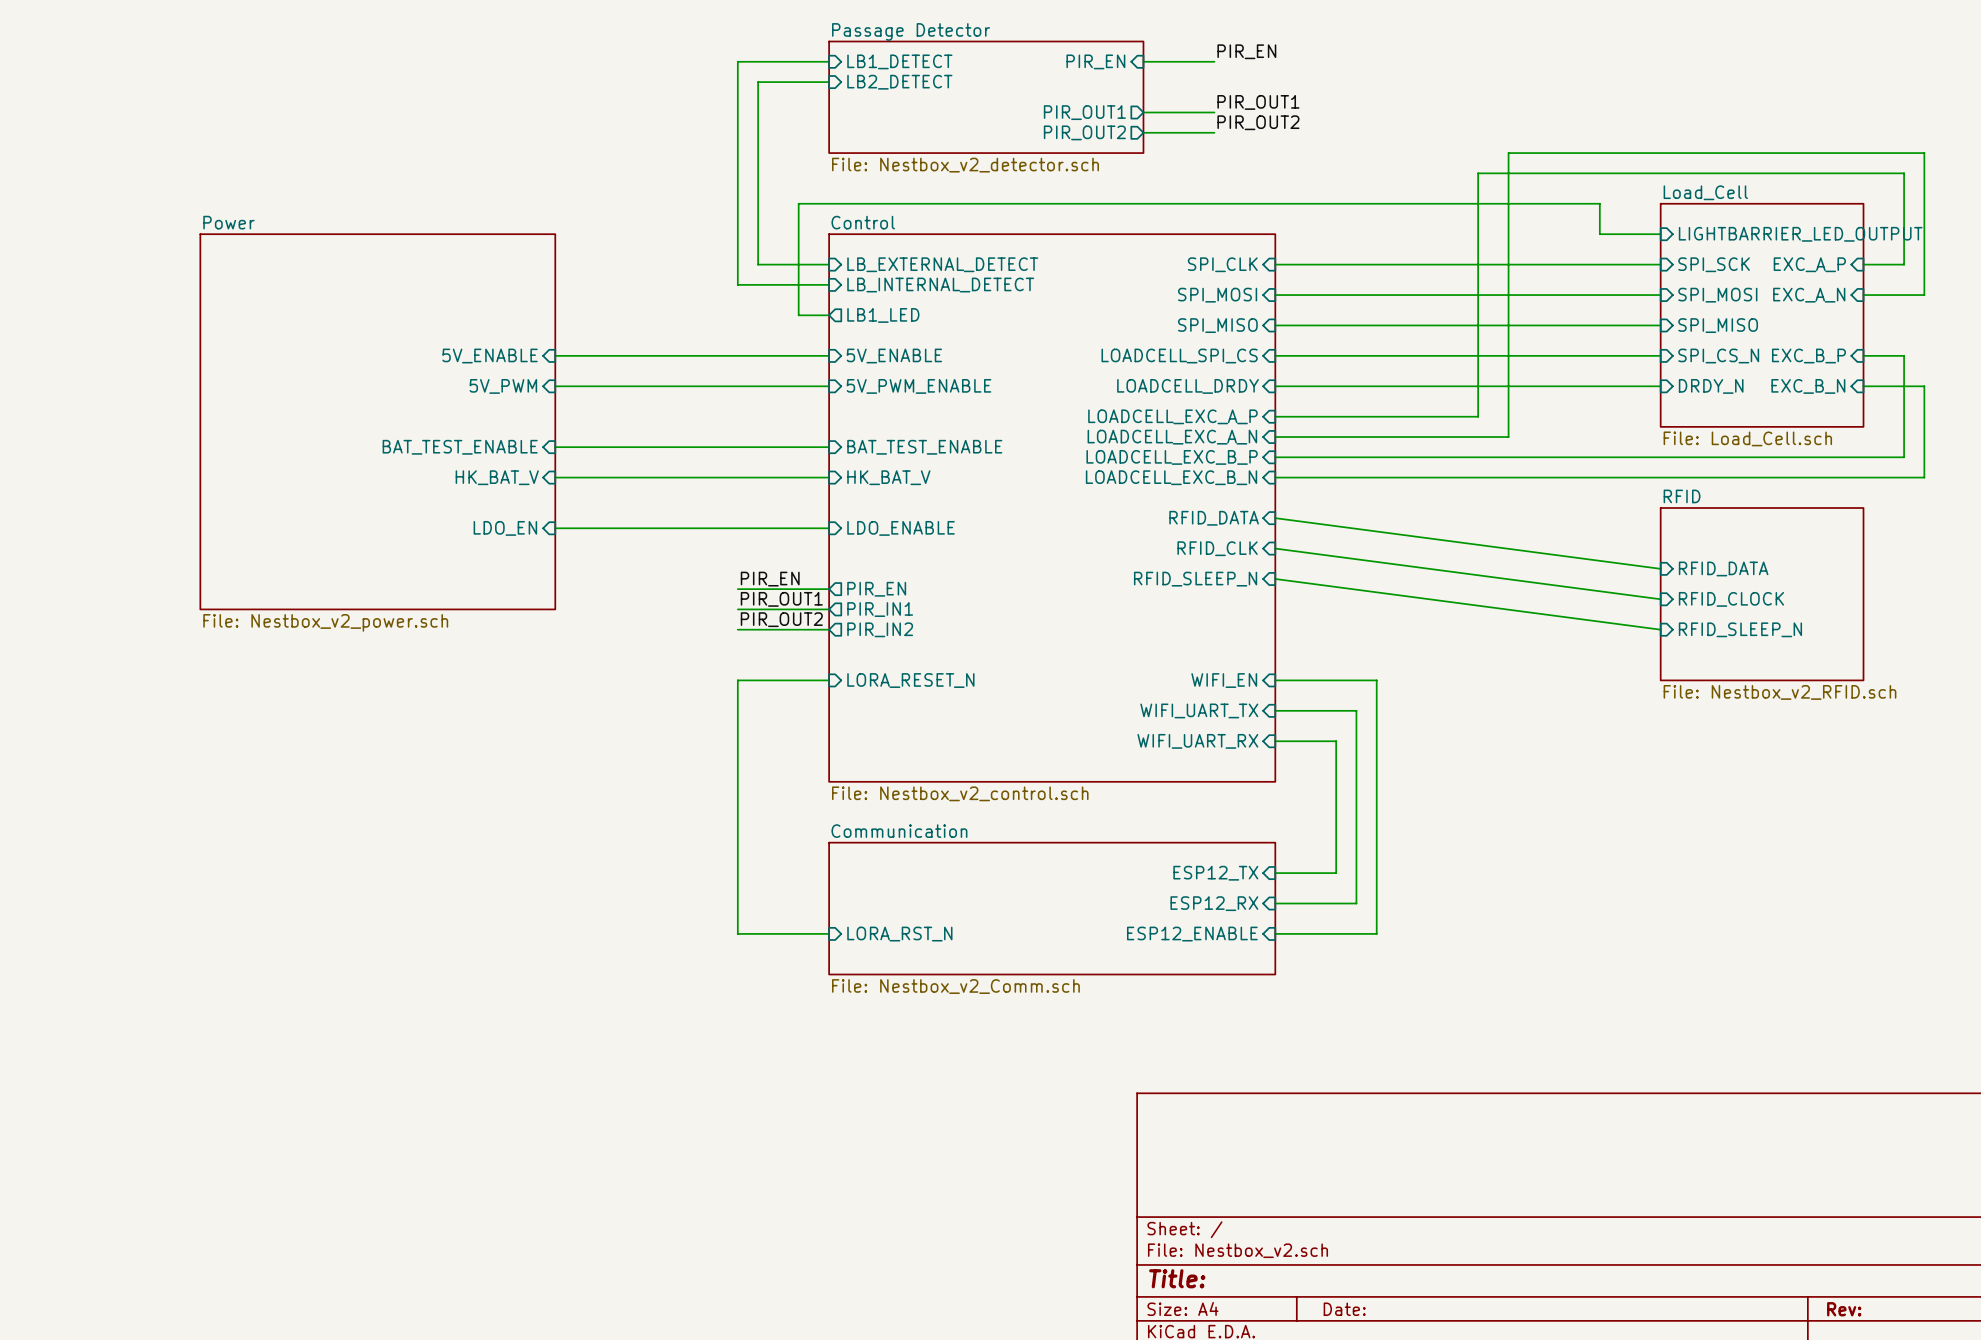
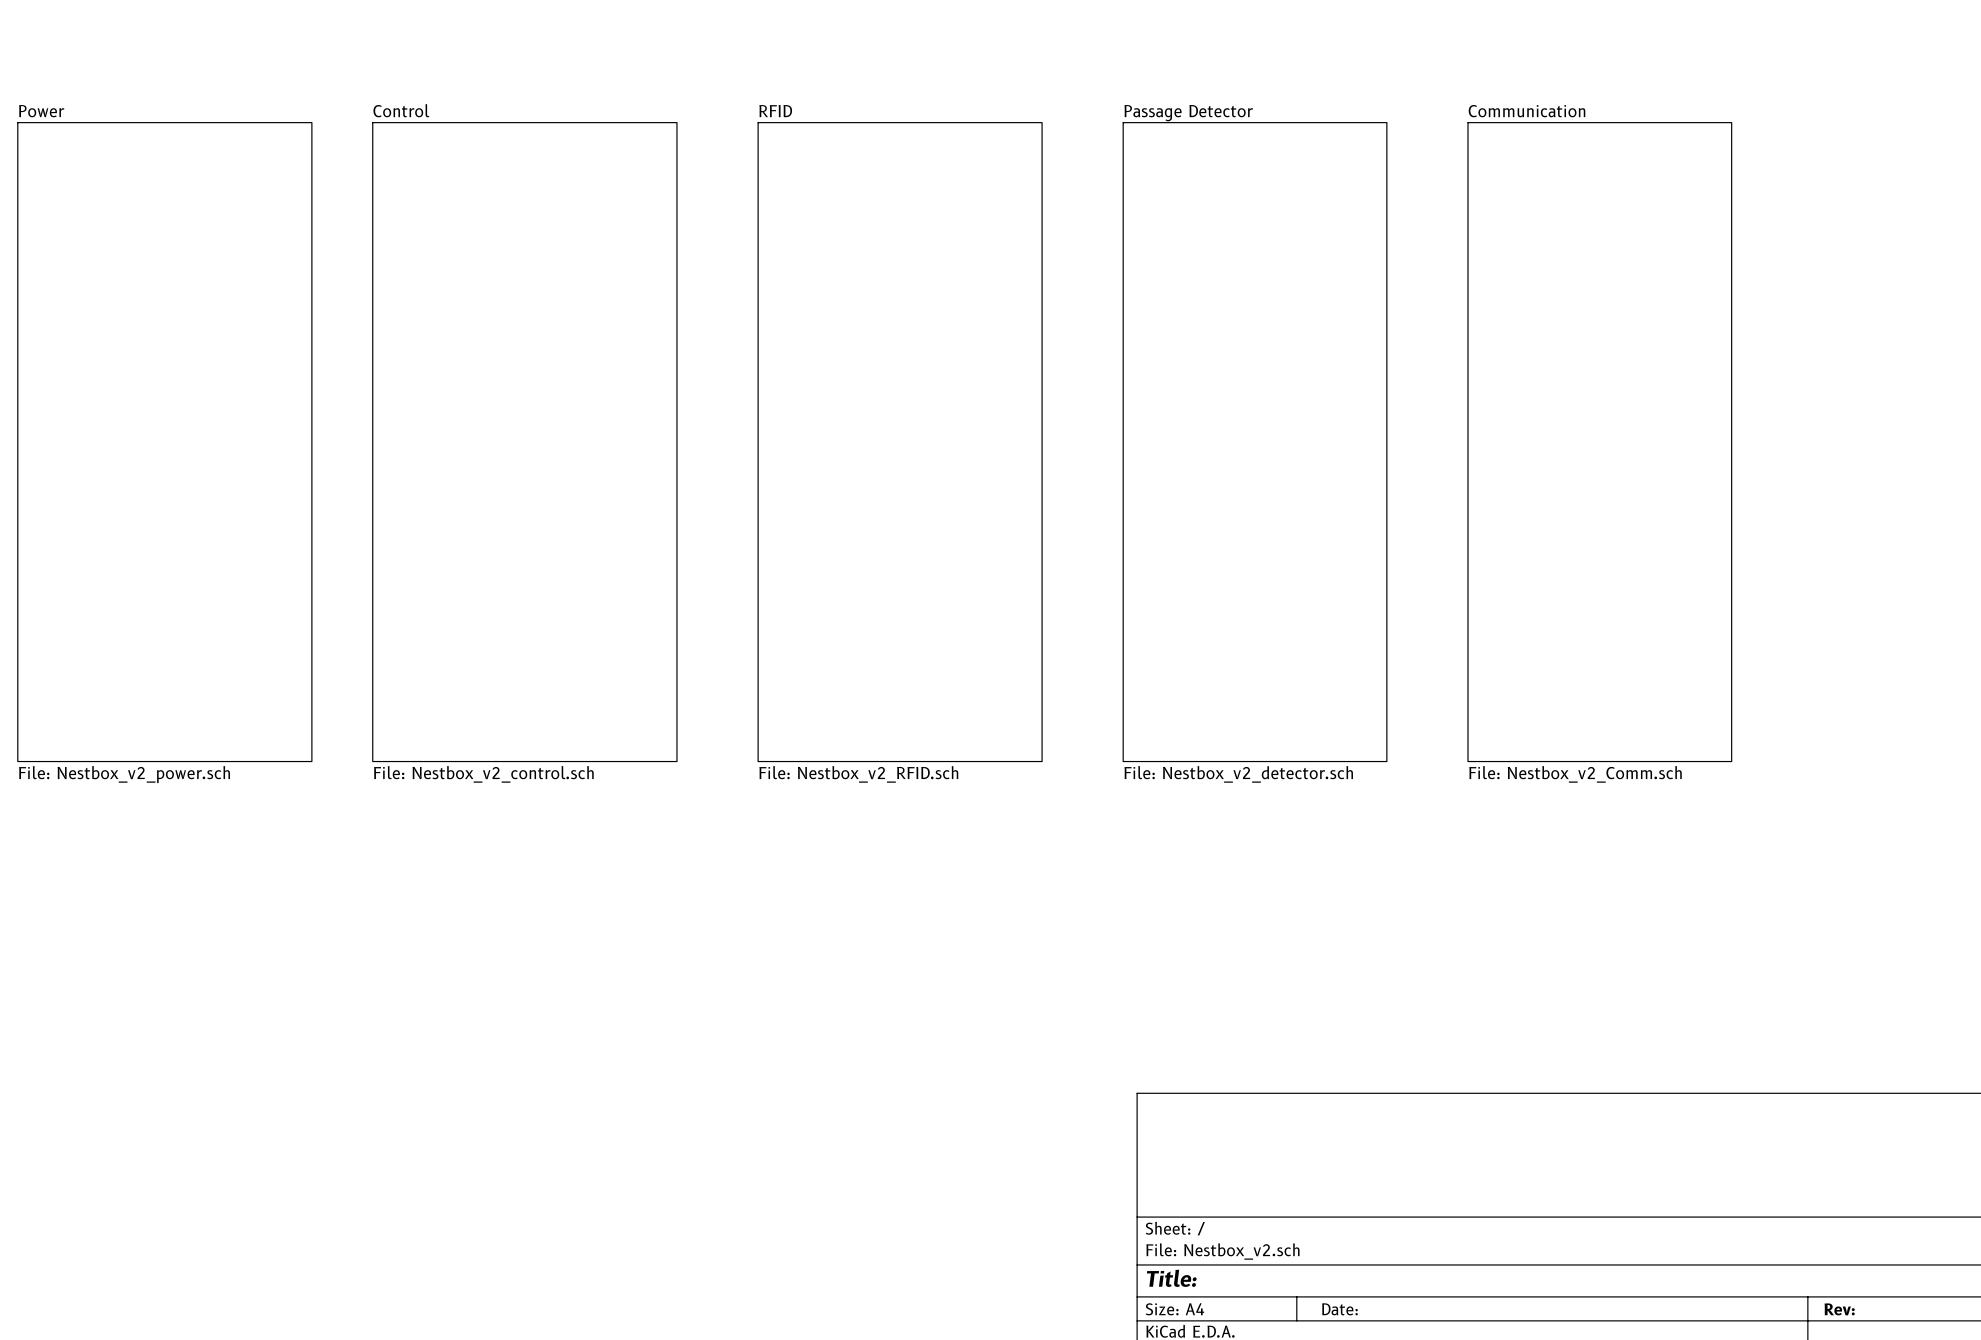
label: PIR_EN (1246, 51) -> none
wire: (829, 61) (737, 61) (737, 284) (829, 284) -> none
sheet pin: LB1_DETECT (899, 61) -> none
sheet pin: PIR_EN (1095, 61) -> none
wire: (1143, 61) (1214, 61) -> none
wire: (829, 82) (758, 82) (758, 264) (829, 264) -> none
sheet pin: LB2_DETECT (899, 82) -> none
sheet Passage Detector: File: Nestbox_v2_detector.sch (986, 97) -> none
label: PIR_OUT1 (1258, 102) -> none
sheet pin: PIR_OUT1 (1084, 112) -> none
wire: (1143, 112) (1214, 112) -> none
label: PIR_OUT2 (1258, 122) -> none
sheet pin: PIR_OUT2 (1084, 132) -> none
wire: (1143, 132) (1214, 132) -> none
wire: (1660, 234) (1599, 234) (1599, 203) (798, 203) (798, 315) (829, 315) -> none
sheet pin: LIGHTBARRIER_LED_OUTPUT (1800, 234) -> none
sheet pin: LB_EXTERNAL_DETECT (942, 264) -> none
sheet pin: SPI_CLK (1222, 264) -> none
wire: (1275, 264) (1660, 264) -> none
sheet pin: SPI_SCK (1714, 264) -> none
sheet pin: EXC_A_P (1809, 264) -> none
wire: (1863, 264) (1904, 264) (1904, 173) (1478, 173) (1478, 416) (1275, 416) -> none
sheet pin: LB_INTERNAL_DETECT (940, 285) -> none
sheet pin: SPI_MOSI (1217, 295) -> none
wire: (1275, 295) (1660, 295) -> none
sheet pin: SPI_MOSI (1717, 295) -> none
sheet pin: EXC_A_N (1809, 295) -> none
wire: (1863, 295) (1924, 295) (1924, 153) (1508, 153) (1508, 437) (1275, 437) -> none
sheet pin: LB1_LED (883, 315) -> none
sheet Load_Cell: File: Load_Cell.sch (1762, 315) -> none
sheet pin: SPI_MISO (1217, 325) -> none
wire: (1275, 325) (1660, 325) -> none
sheet pin: SPI_MISO (1718, 325) -> none
wire: (555, 355) (829, 355) -> none
wire: (1275, 355) (1660, 355) -> none
wire: (1863, 355) (1904, 355) (1904, 457) (1275, 457) -> none
sheet pin: 5V_ENABLE (490, 356) -> none
sheet pin: 5V_ENABLE (894, 356) -> none
sheet pin: LOADCELL_SPI_CS (1179, 356) -> none
sheet pin: SPI_CS_N (1718, 356) -> none
sheet pin: EXC_B_P (1808, 356) -> none
sheet pin: 5V_PWM (503, 386) -> none
wire: (555, 386) (829, 386) -> none
sheet pin: 5V_PWM_ENABLE (918, 386) -> none
sheet pin: LOADCELL_DRDY (1188, 386) -> none
wire: (1275, 386) (1660, 386) -> none
sheet pin: DRDY_N (1711, 386) -> none
sheet pin: EXC_B_N (1808, 386) -> none
wire: (1863, 386) (1924, 386) (1924, 477) (1275, 477) -> none
sheet pin: LOADCELL_EXC_A_P (1172, 416) -> none
sheet Power: File: Nestbox_v2_power.sch (377, 421) -> none
sheet pin: LOADCELL_EXC_A_N (1172, 437) -> none
sheet Power: none -> File: Nestbox_v2_power.sch (164, 442)
sheet Control: none -> File: Nestbox_v2_control.sch (524, 442)
sheet RFID: none -> File: Nestbox_v2_RFID.sch (900, 442)
sheet Passage Detector: none -> File: Nestbox_v2_detector.sch (1255, 442)
sheet Communication: none -> File: Nestbox_v2_Comm.sch (1599, 442)
sheet pin: BAT_TEST_ENABLE (460, 447) -> none
wire: (555, 447) (829, 447) -> none
sheet pin: BAT_TEST_ENABLE (924, 447) -> none
sheet pin: LOADCELL_EXC_B_P (1172, 457) -> none
sheet pin: HK_BAT_V (497, 477) -> none
wire: (555, 477) (829, 477) -> none
sheet pin: HK_BAT_V (888, 477) -> none
sheet pin: LOADCELL_EXC_B_N (1171, 477) -> none
sheet Control: File: Nestbox_v2_control.sch (1052, 508) -> none
sheet pin: RFID_DATA (1214, 518) -> none
wire: (1275, 518) (1660, 568) -> none
sheet pin: LDO_EN (505, 528) -> none
wire: (555, 528) (829, 528) -> none
sheet pin: LDO_ENABLE (901, 528) -> none
sheet pin: RFID_CLK (1217, 548) -> none
wire: (1275, 548) (1660, 599) -> none
sheet pin: RFID_DATA (1723, 568) -> none
wire: (1275, 578) (1660, 629) -> none
label: PIR_EN (770, 579) -> none
sheet pin: RFID_SLEEP_N (1195, 579) -> none
wire: (737, 589) (829, 589) -> none
sheet pin: PIR_EN (876, 589) -> none
sheet RFID: File: Nestbox_v2_RFID.sch (1762, 594) -> none
label: PIR_OUT1 (781, 599) -> none
sheet pin: RFID_CLOCK (1731, 599) -> none
wire: (737, 609) (829, 609) -> none
sheet pin: PIR_IN1 (880, 609) -> none
label: PIR_OUT2 (781, 619) -> none
wire: (737, 629) (829, 629) -> none
sheet pin: PIR_IN2 (880, 629) -> none
sheet pin: RFID_SLEEP_N (1740, 629) -> none
wire: (829, 680) (737, 680) (737, 933) (829, 933) -> none
sheet pin: LORA_RESET_N (910, 680) -> none
sheet pin: WIFI_EN (1224, 680) -> none
wire: (1275, 680) (1376, 680) (1376, 933) (1275, 933) -> none
sheet pin: WIFI_UART_TX (1199, 710) -> none
wire: (1275, 710) (1356, 710) (1356, 903) (1275, 903) -> none
sheet pin: WIFI_UART_RX (1197, 741) -> none
wire: (1275, 741) (1336, 741) (1336, 873) (1275, 873) -> none
sheet pin: ESP12_TX (1215, 873) -> none
sheet pin: ESP12_RX (1214, 903) -> none
sheet Communication: File: Nestbox_v2_Comm.sch (1052, 908) -> none
sheet pin: LORA_RST_N (899, 934) -> none
sheet pin: ESP12_ENABLE (1192, 934) -> none

